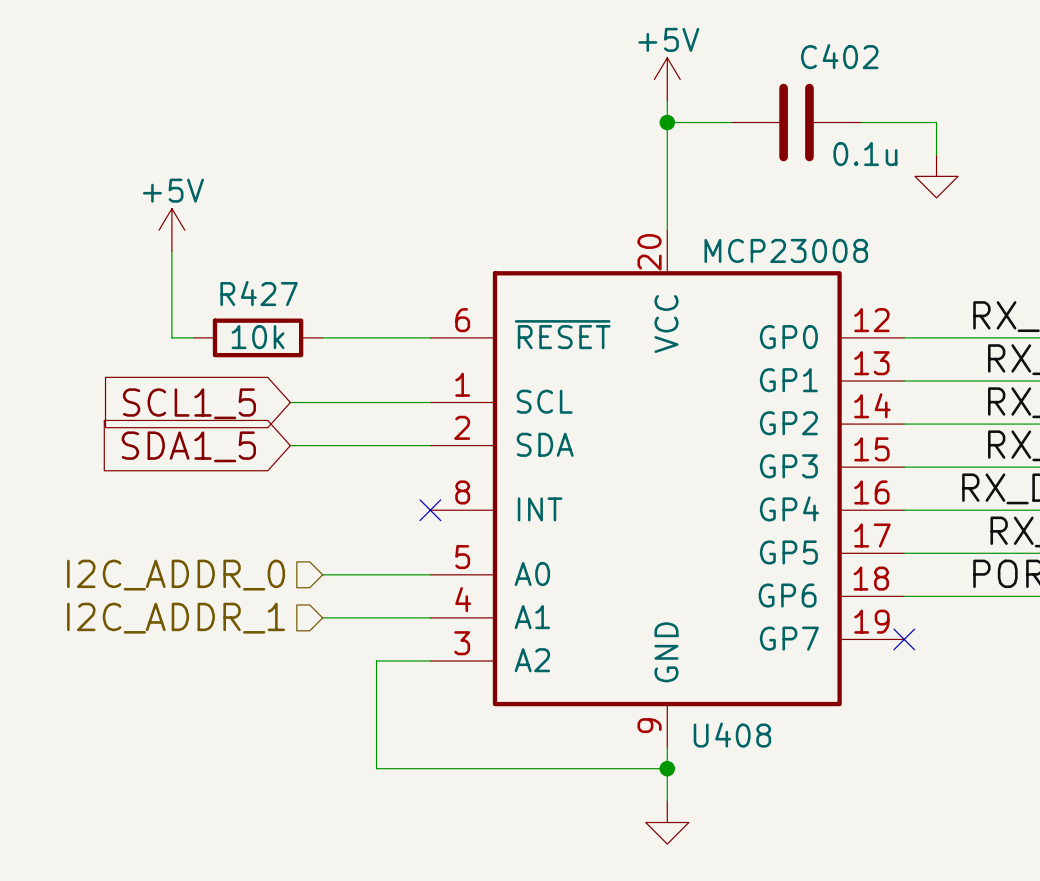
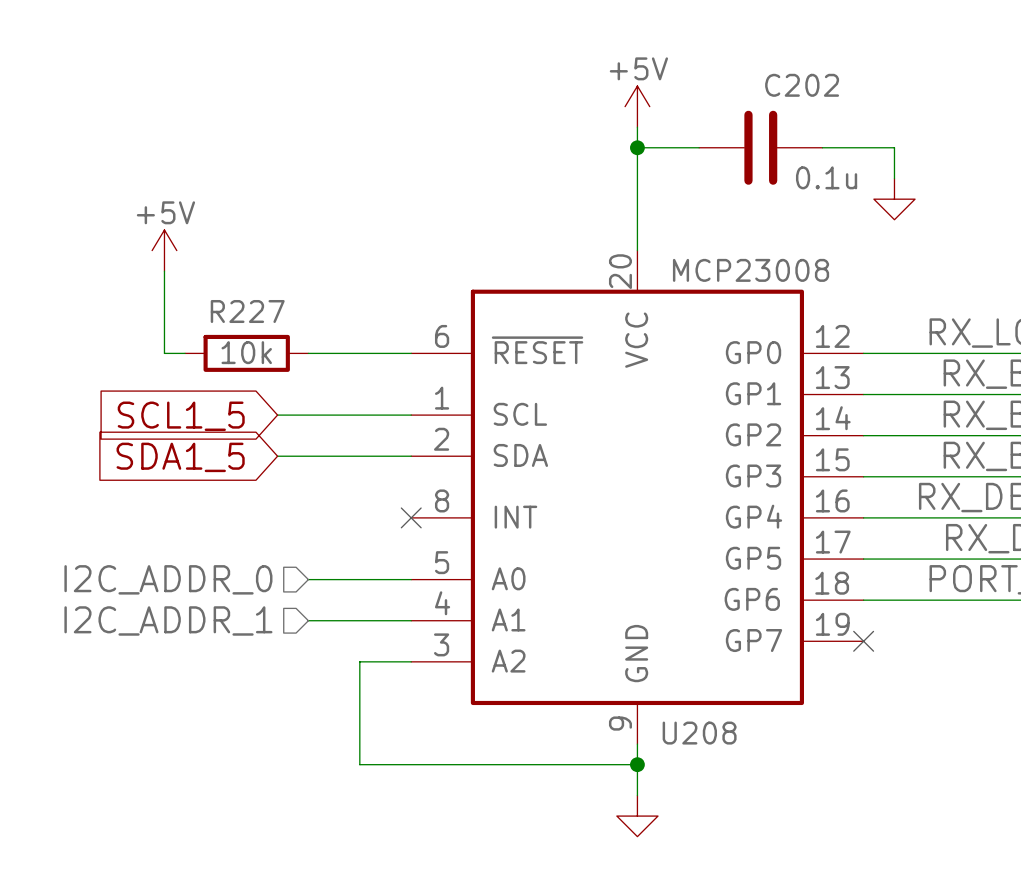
C402 name: C402 (839, 56) -> C202 (802, 85)
R427 name: R427 (259, 293) -> R227 (247, 311)
U408 name: U408 (732, 735) -> U208 (699, 733)

